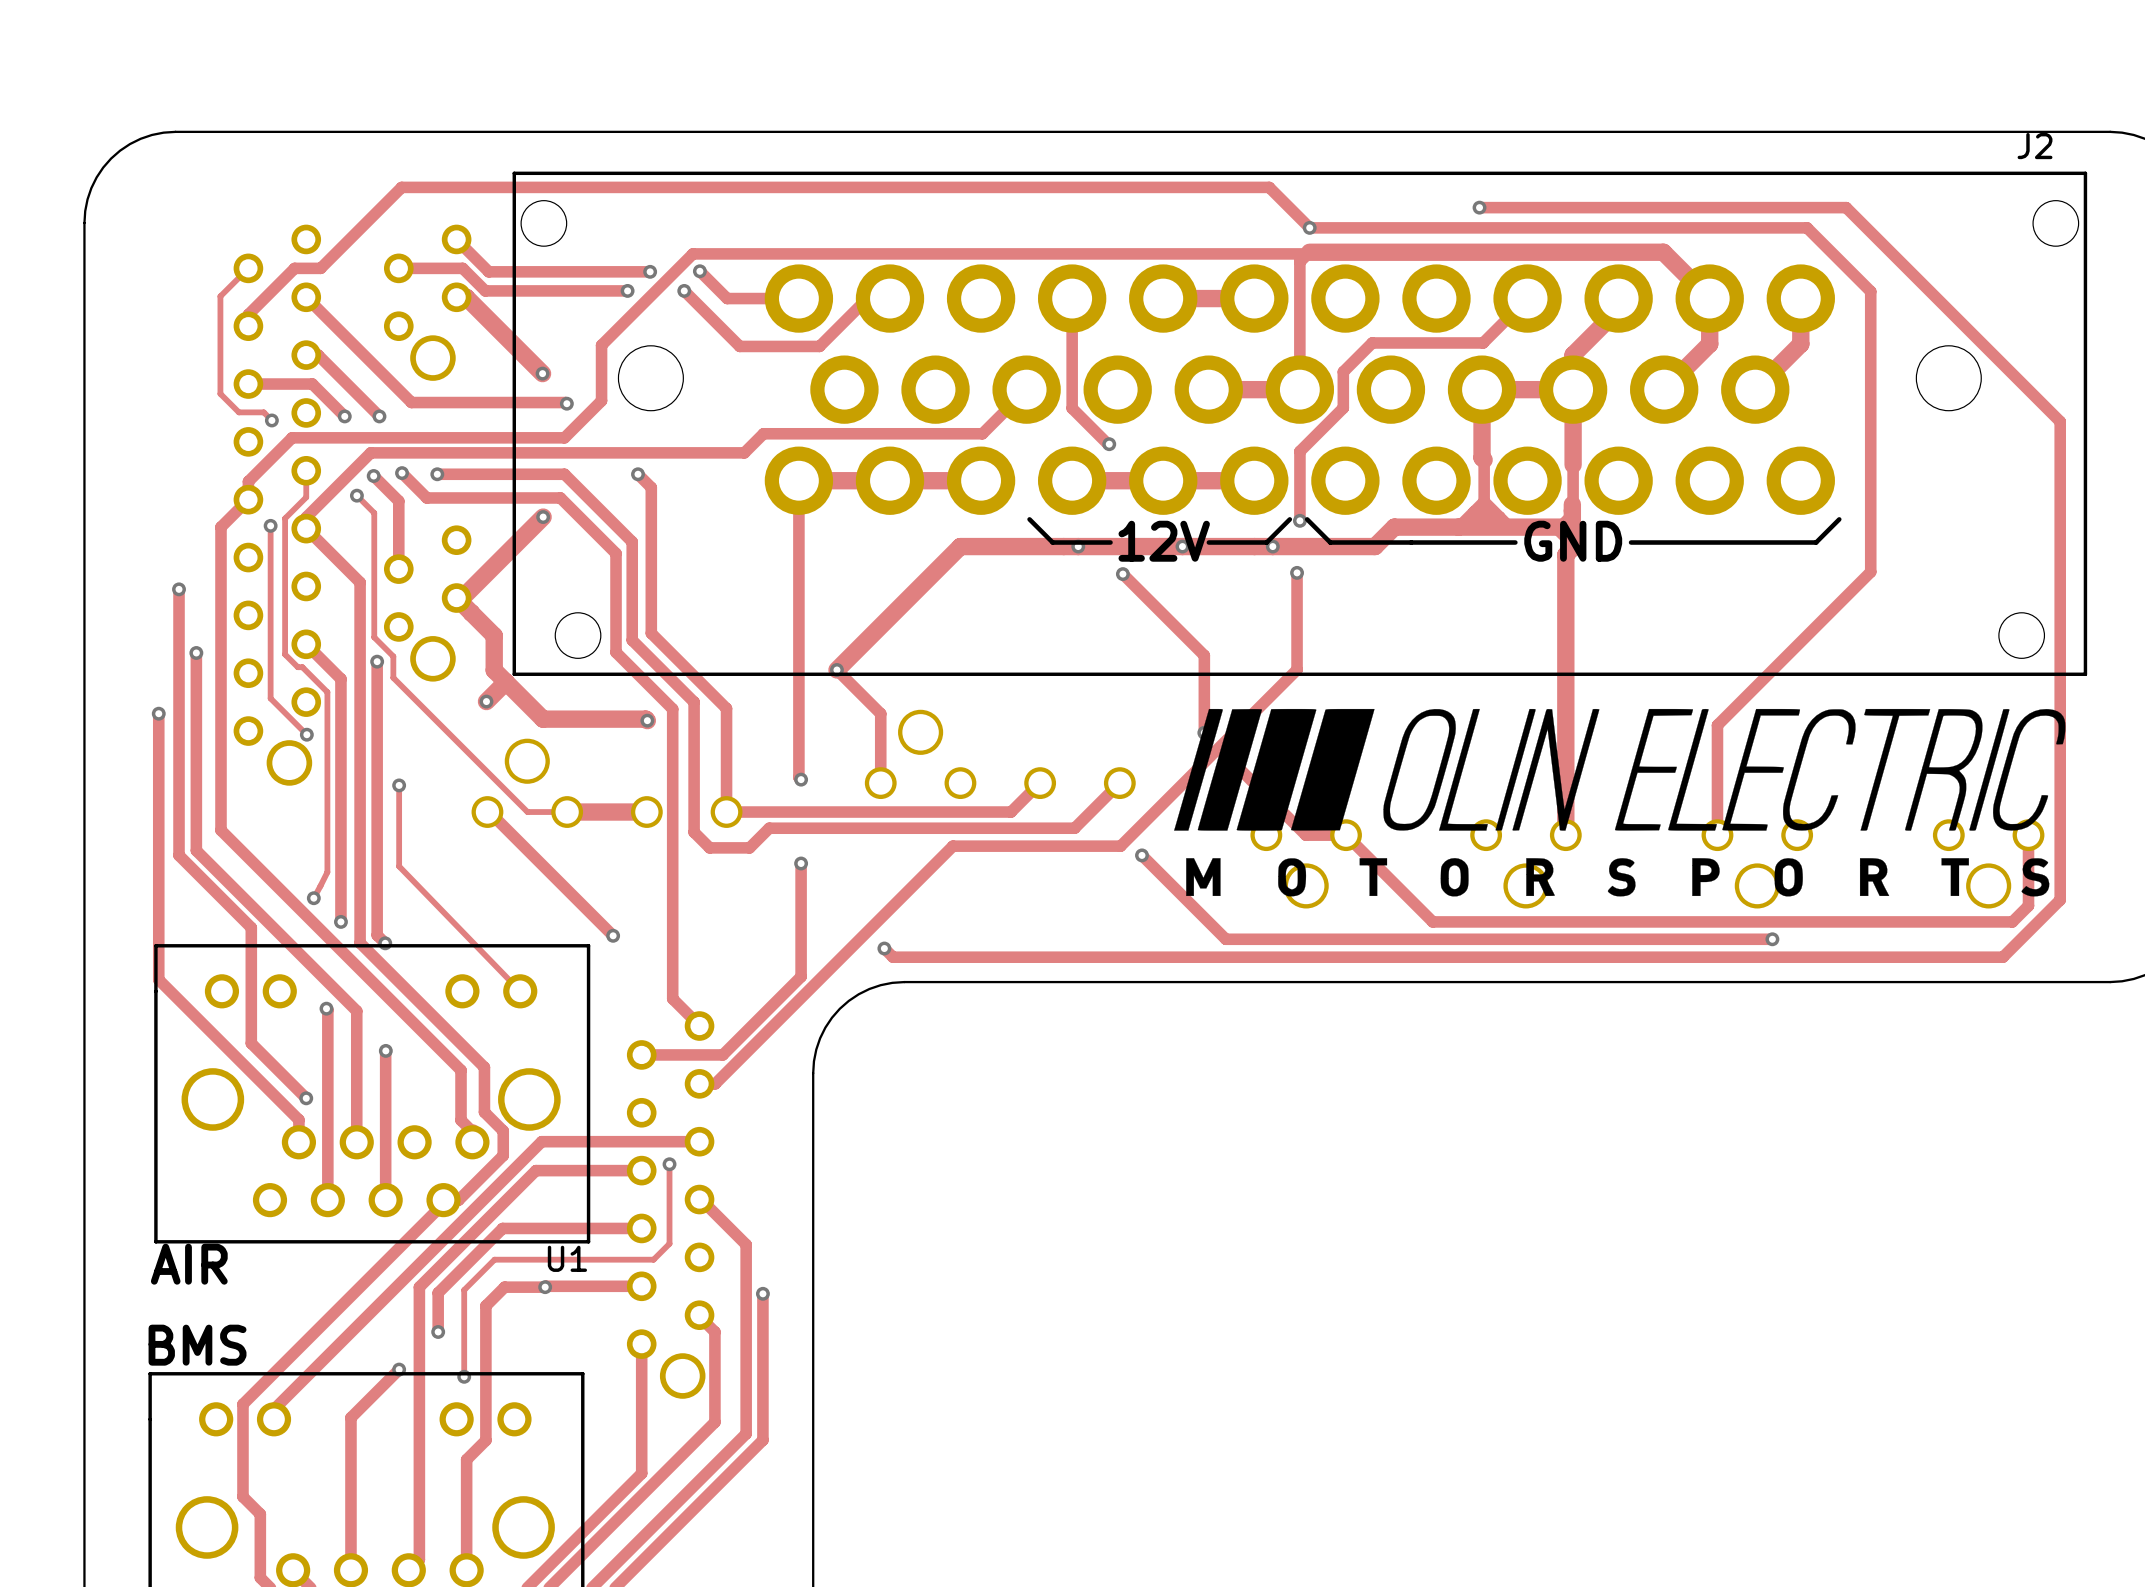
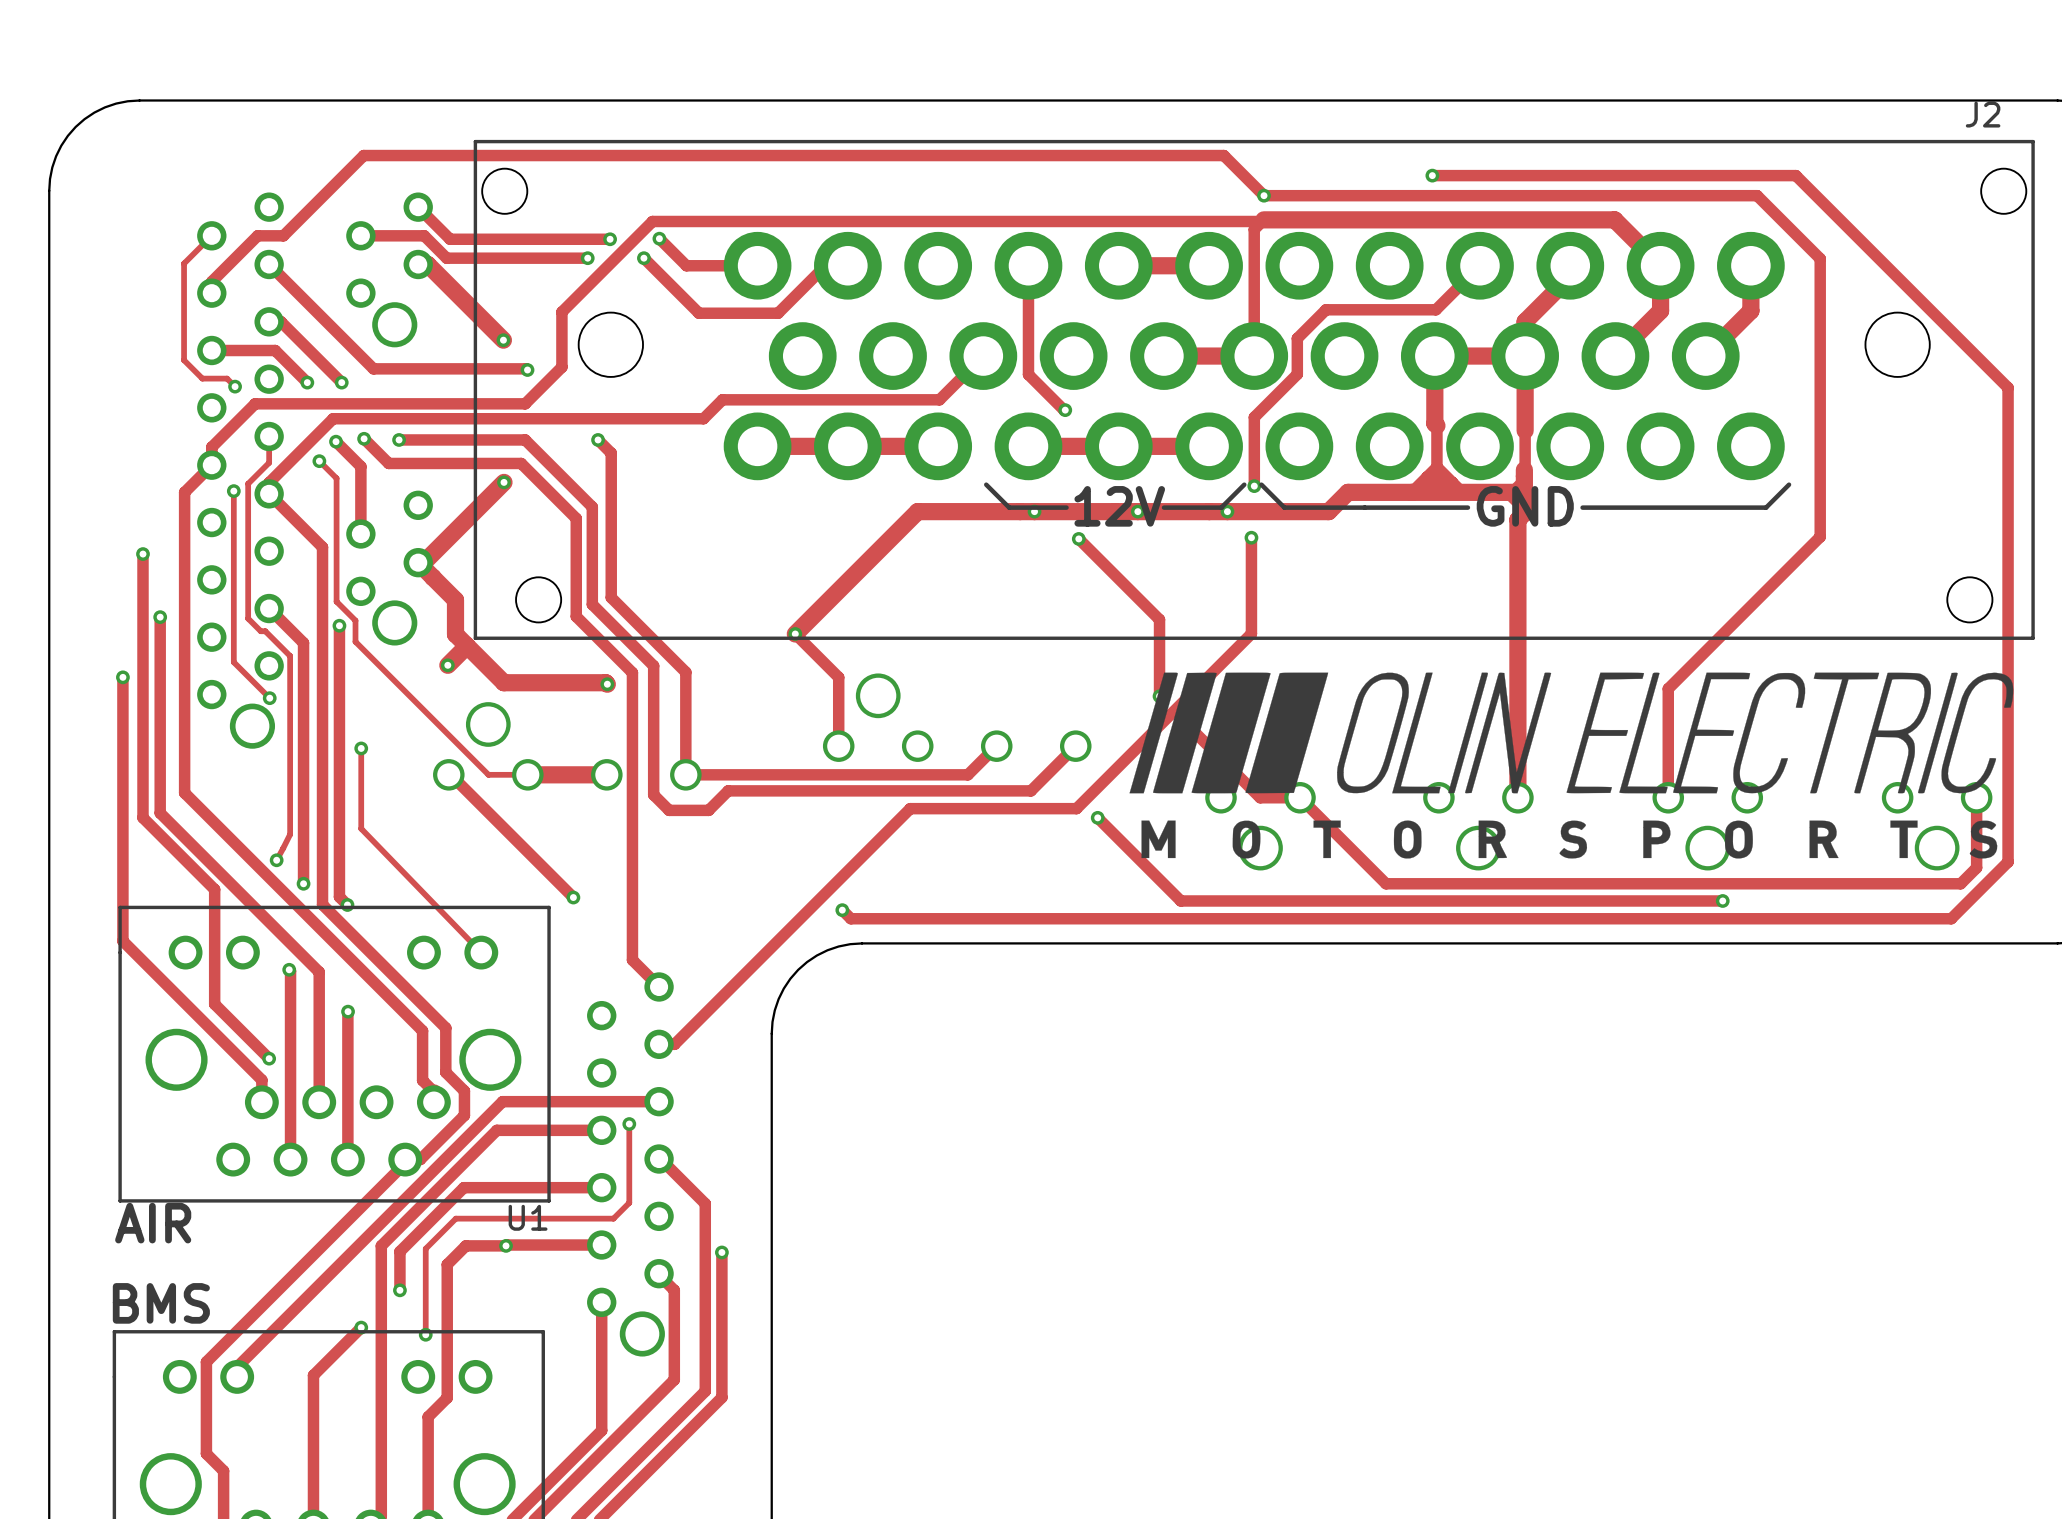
track: (798, 480) (798, 777) (801, 779) -> none
via: (801, 779) -> none
track: (801, 863) (801, 976) (722, 1054) (641, 1054) -> none
via: (801, 863) -> none

